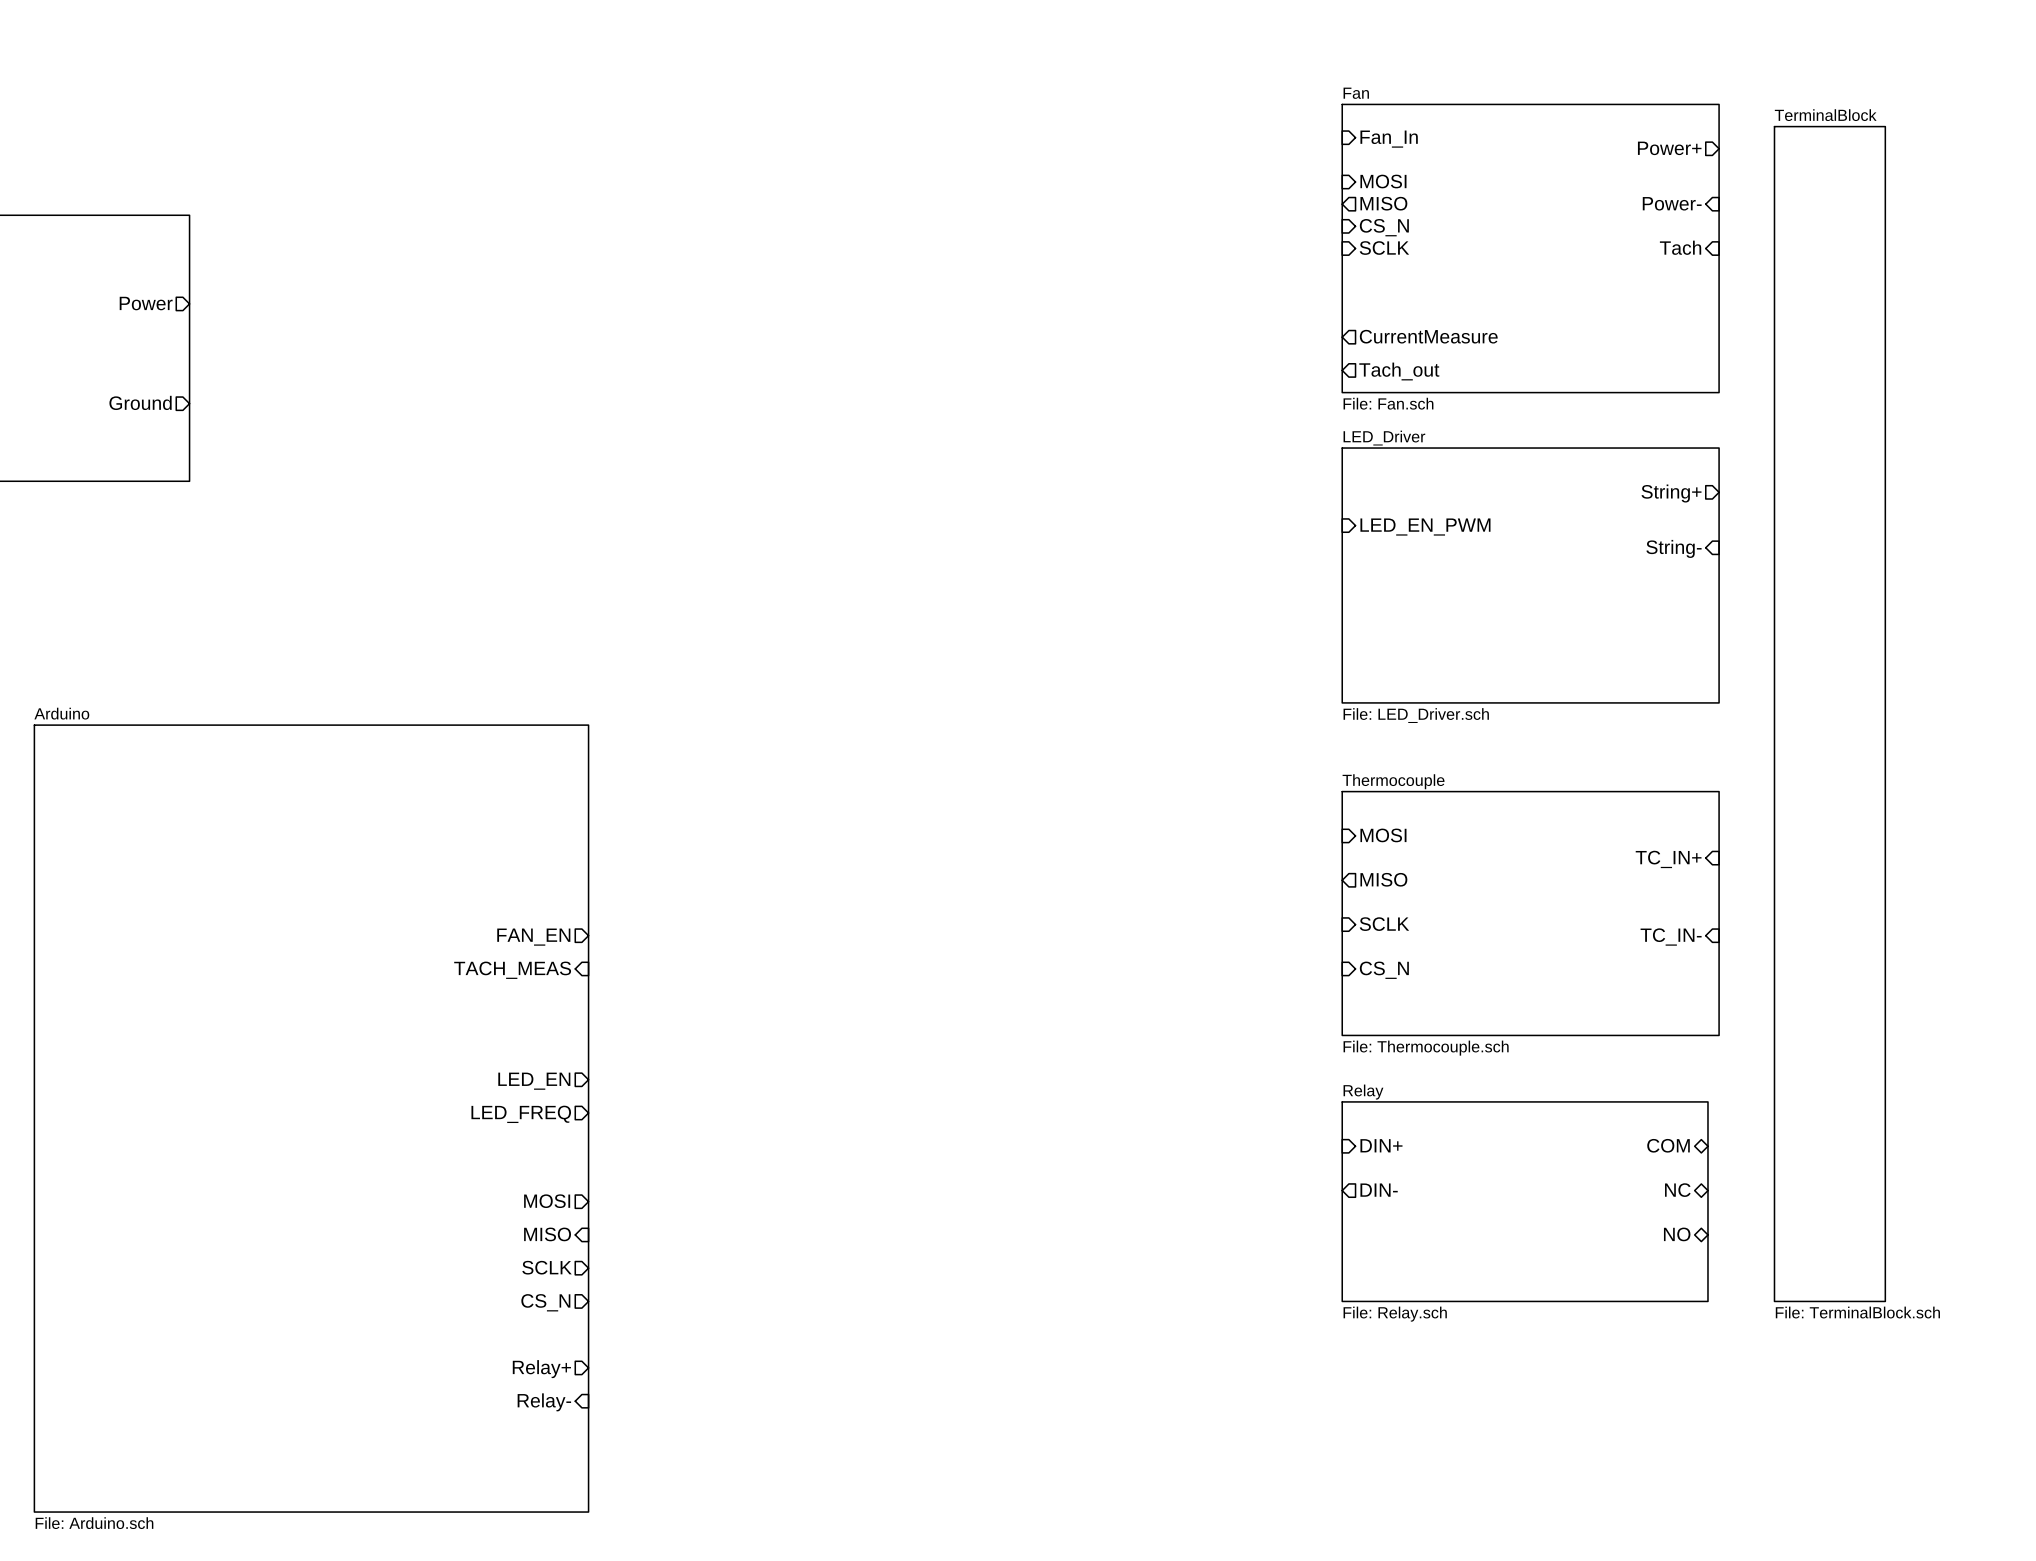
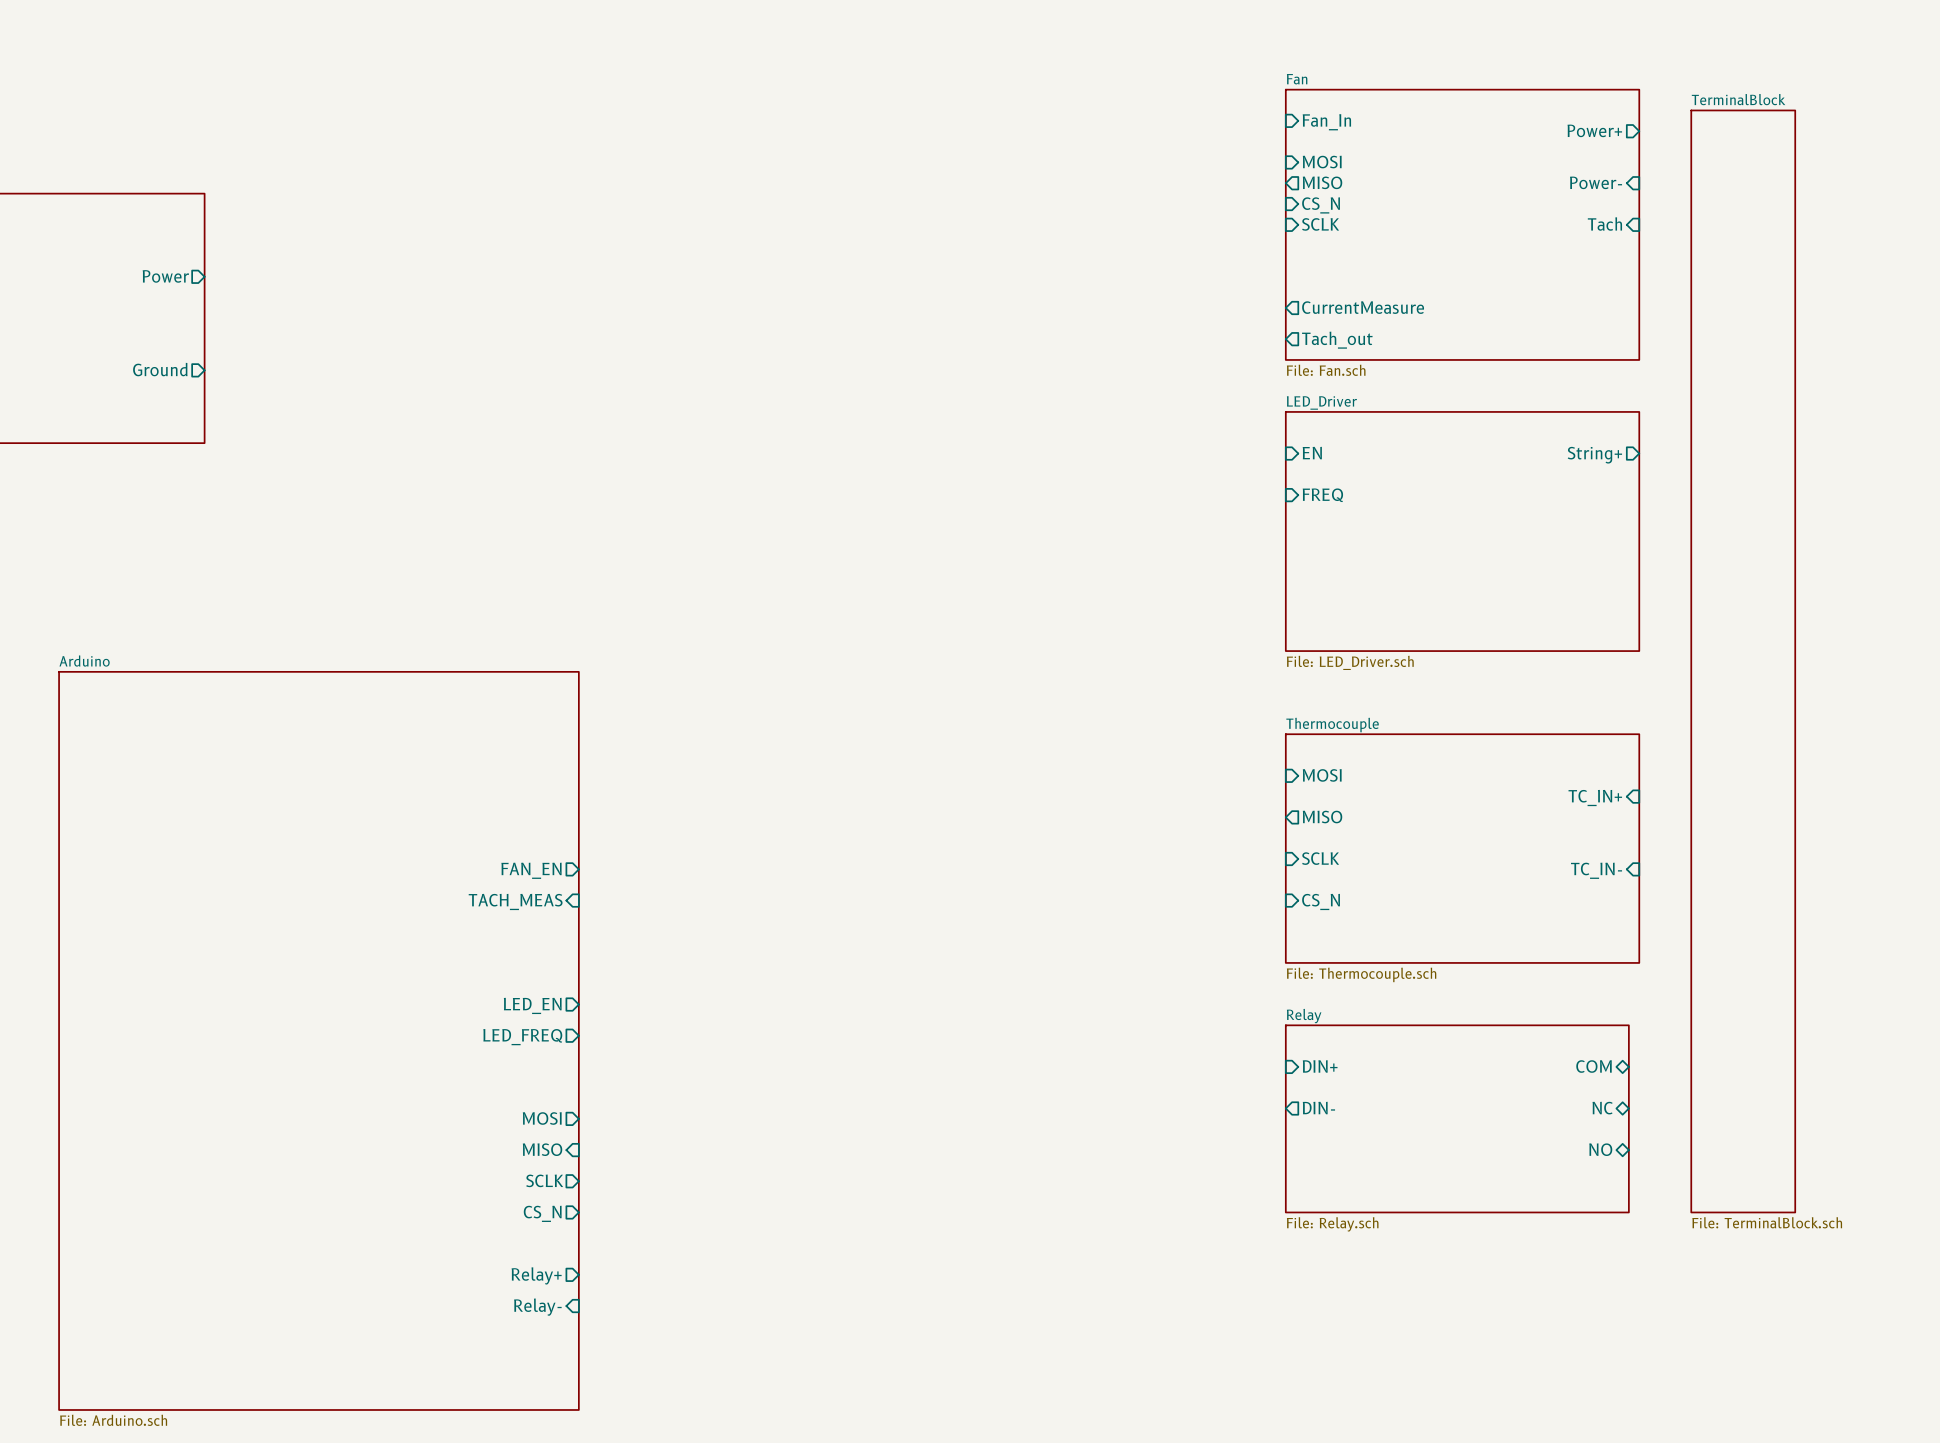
sheet pin: none -> EN (1312, 453)
sheet pin: LED_EN_PWM (1425, 527) -> none
sheet pin: none -> FREQ (1322, 495)
sheet pin: String- (1673, 548) -> none

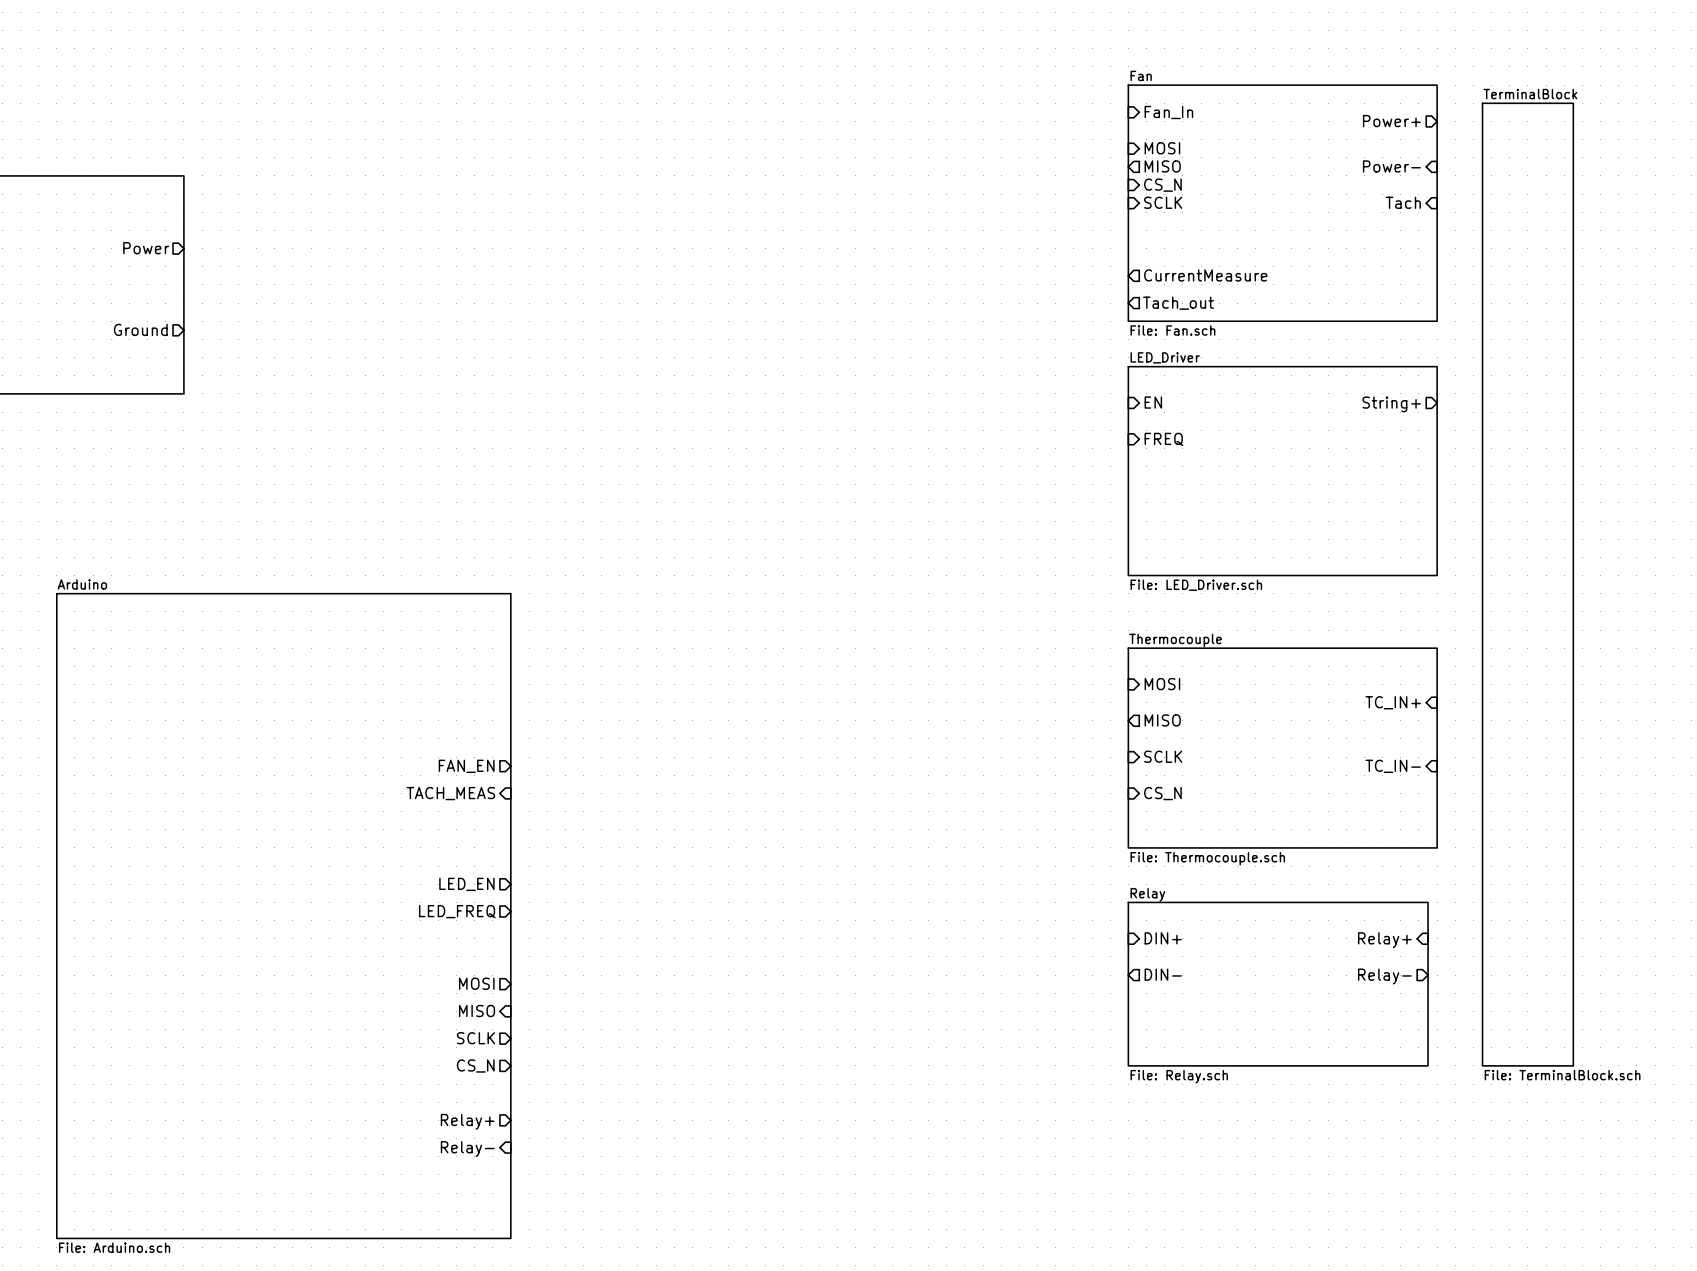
sheet pin shape: bidirectional (1594, 1066) -> input (1384, 940)
sheet pin: COM (1594, 1066) -> Relay+ (1384, 940)
sheet pin shape: bidirectional (1602, 1108) -> output (1384, 976)
sheet pin: NC (1602, 1108) -> Relay- (1384, 976)
sheet pin: NO (1600, 1149) -> none

